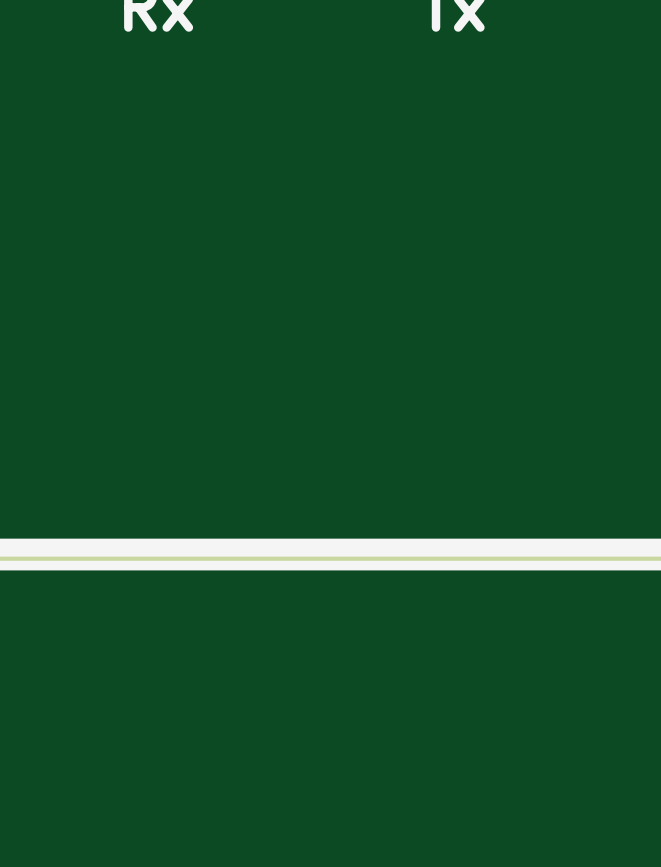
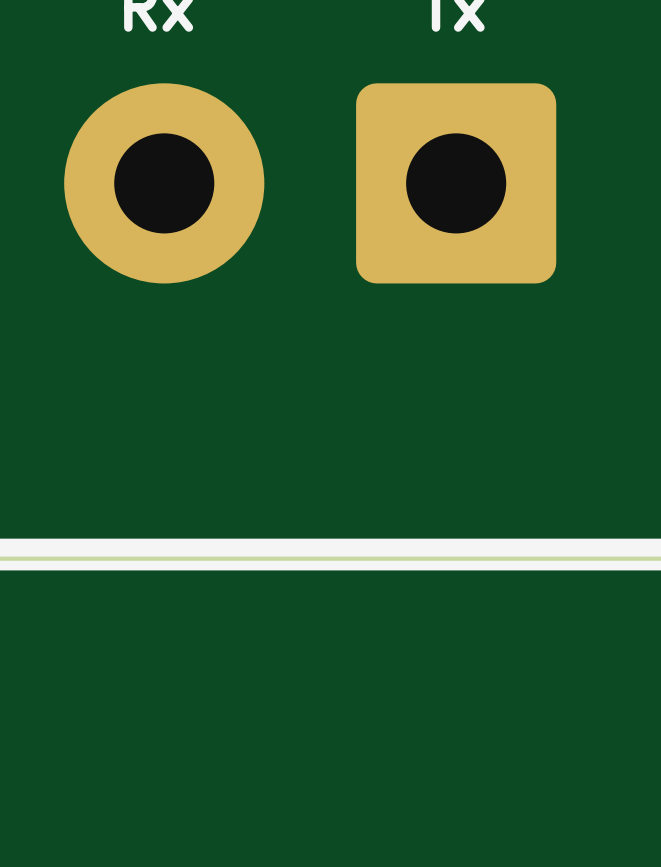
part: none -> (310, 183)

